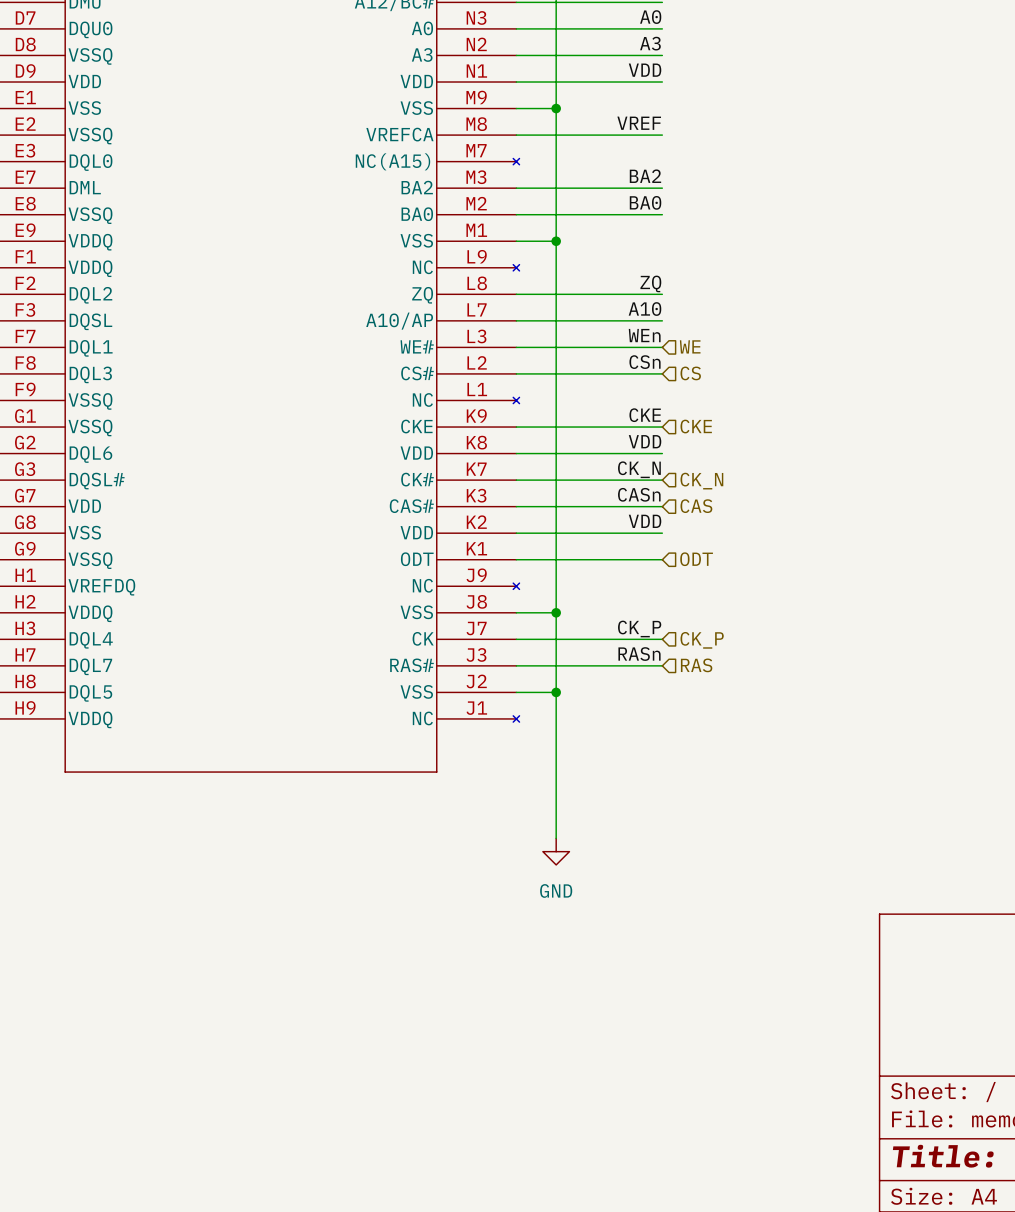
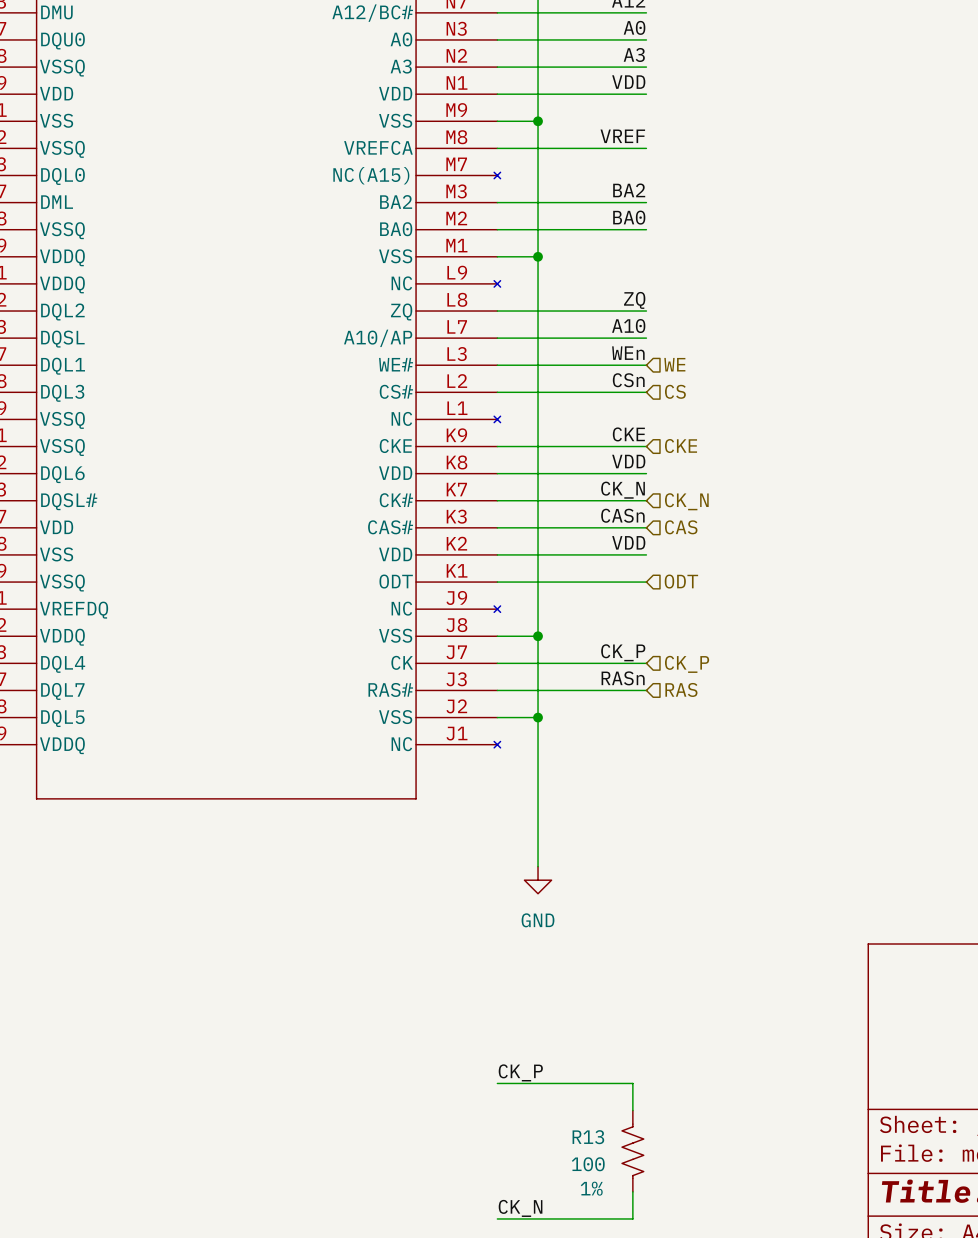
label: none -> CK_P (520, 1072)
wire: none -> (497, 1083) (632, 1083) (632, 1110)
R13: none -> 100 (632, 1151)
wire: none -> (632, 1191) (632, 1218) (497, 1218)
label: none -> CK_N (520, 1208)

